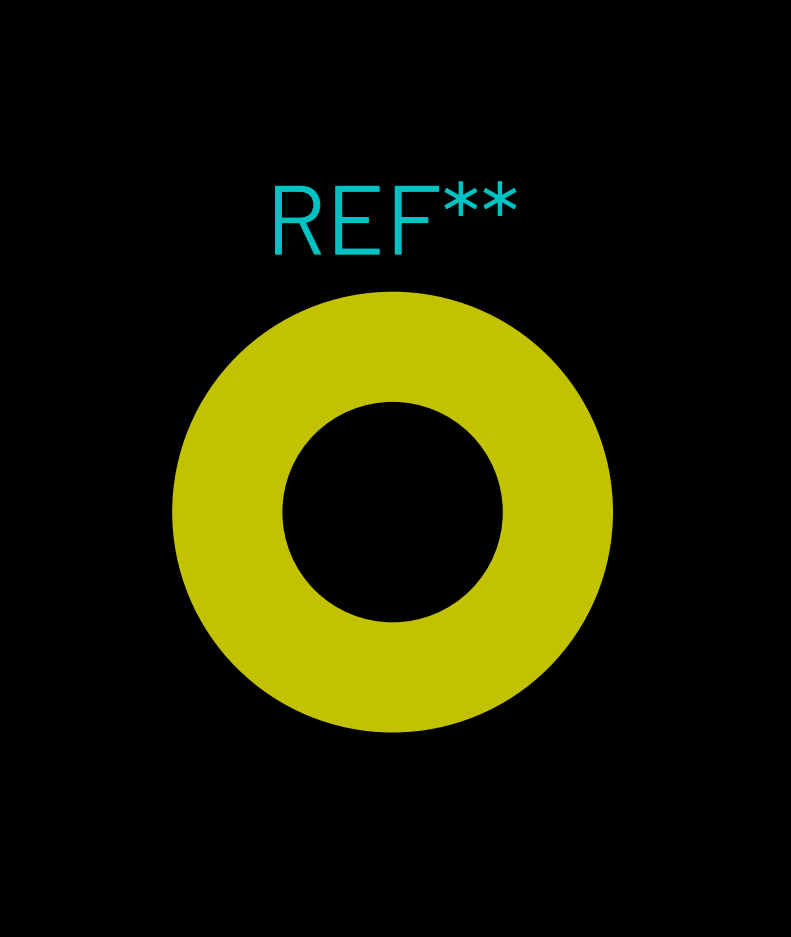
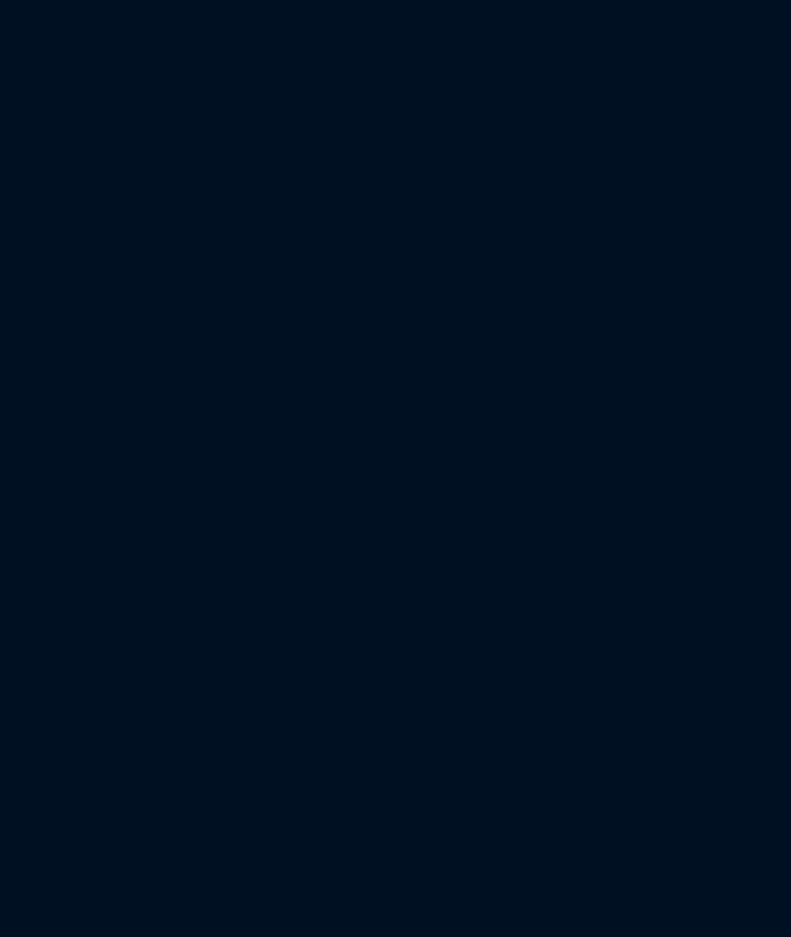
REF**: (392, 512) -> none

